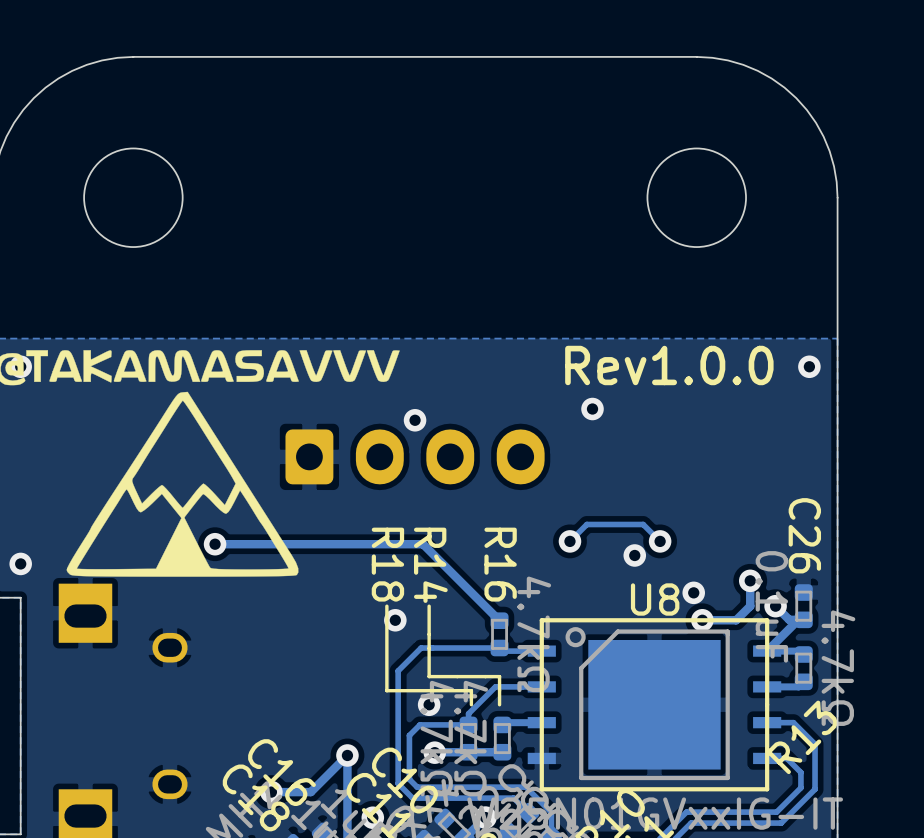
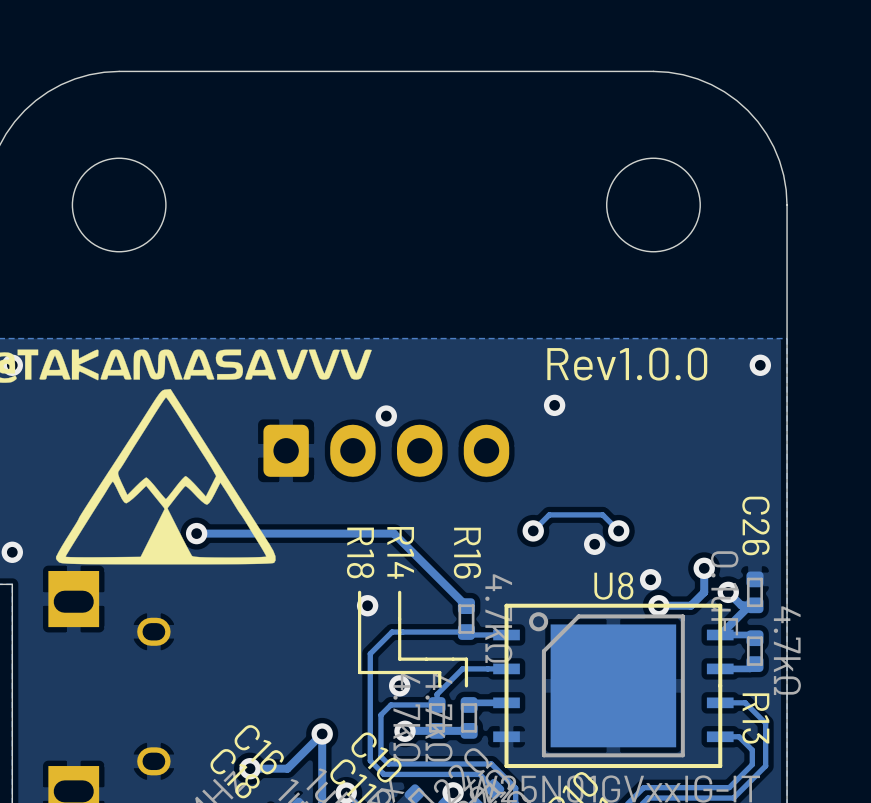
R13 name rotation: 0° (802, 737) -> 135° clockwise (755, 718)

